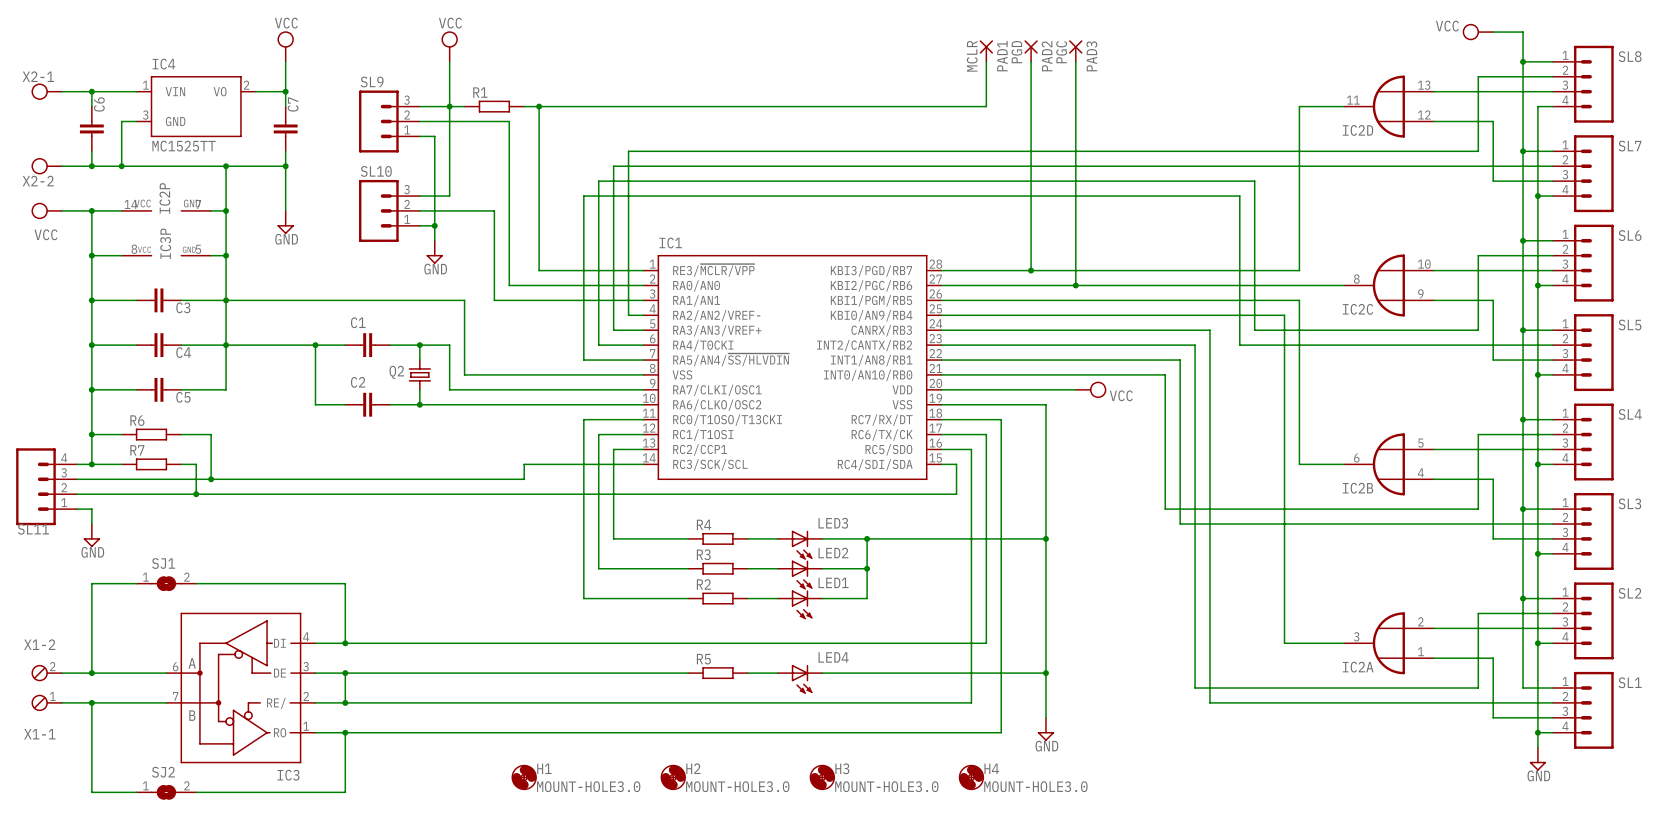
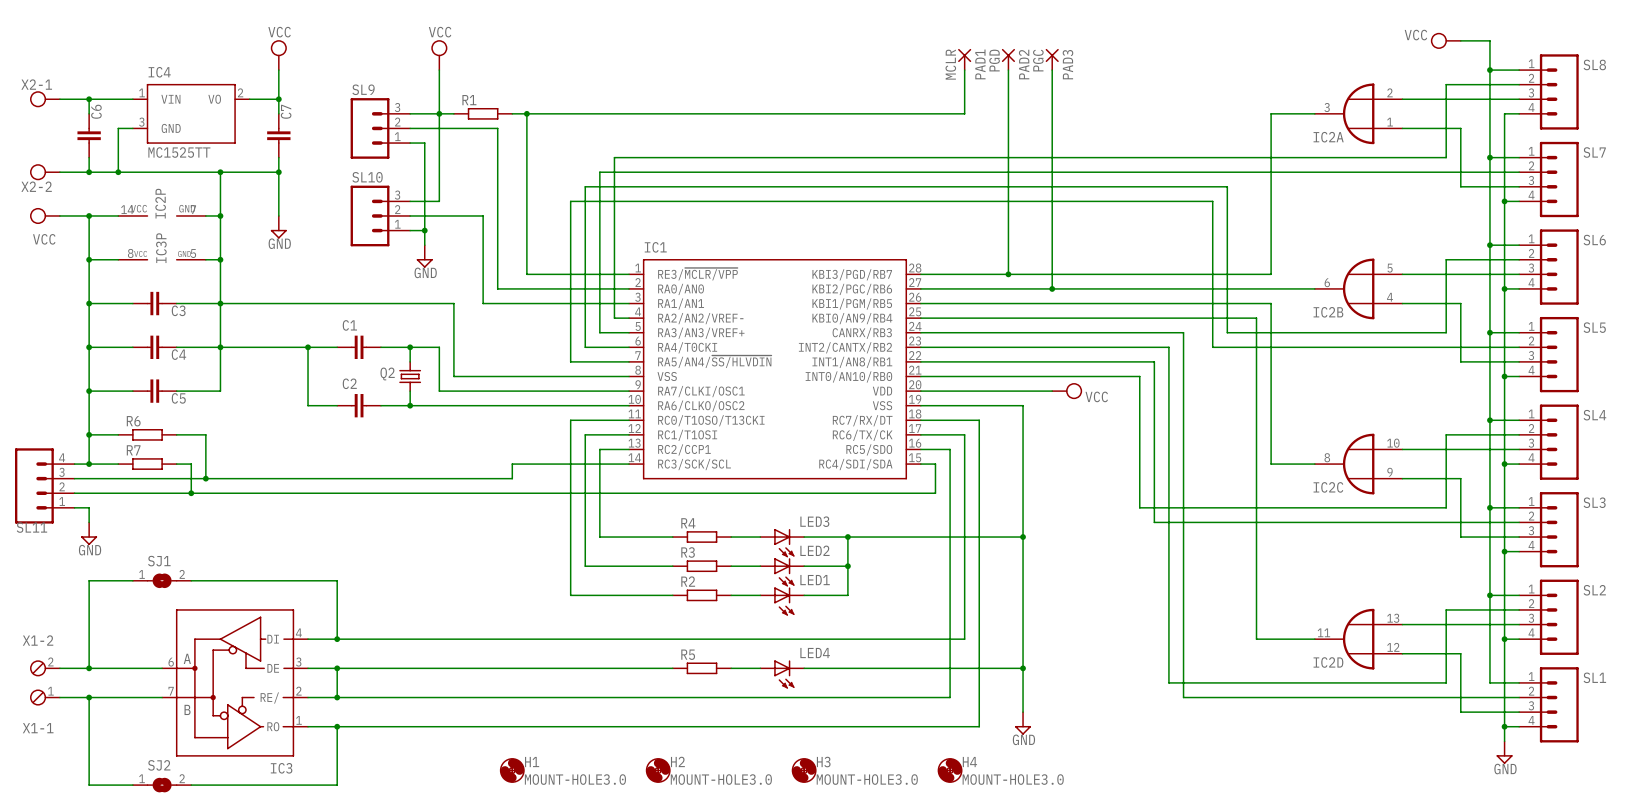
IC2D position: (1388, 106) -> (1358, 639)
IC2C position: (1388, 285) -> (1358, 464)
IC2B position: (1388, 464) -> (1358, 288)
IC2A position: (1388, 643) -> (1358, 113)

